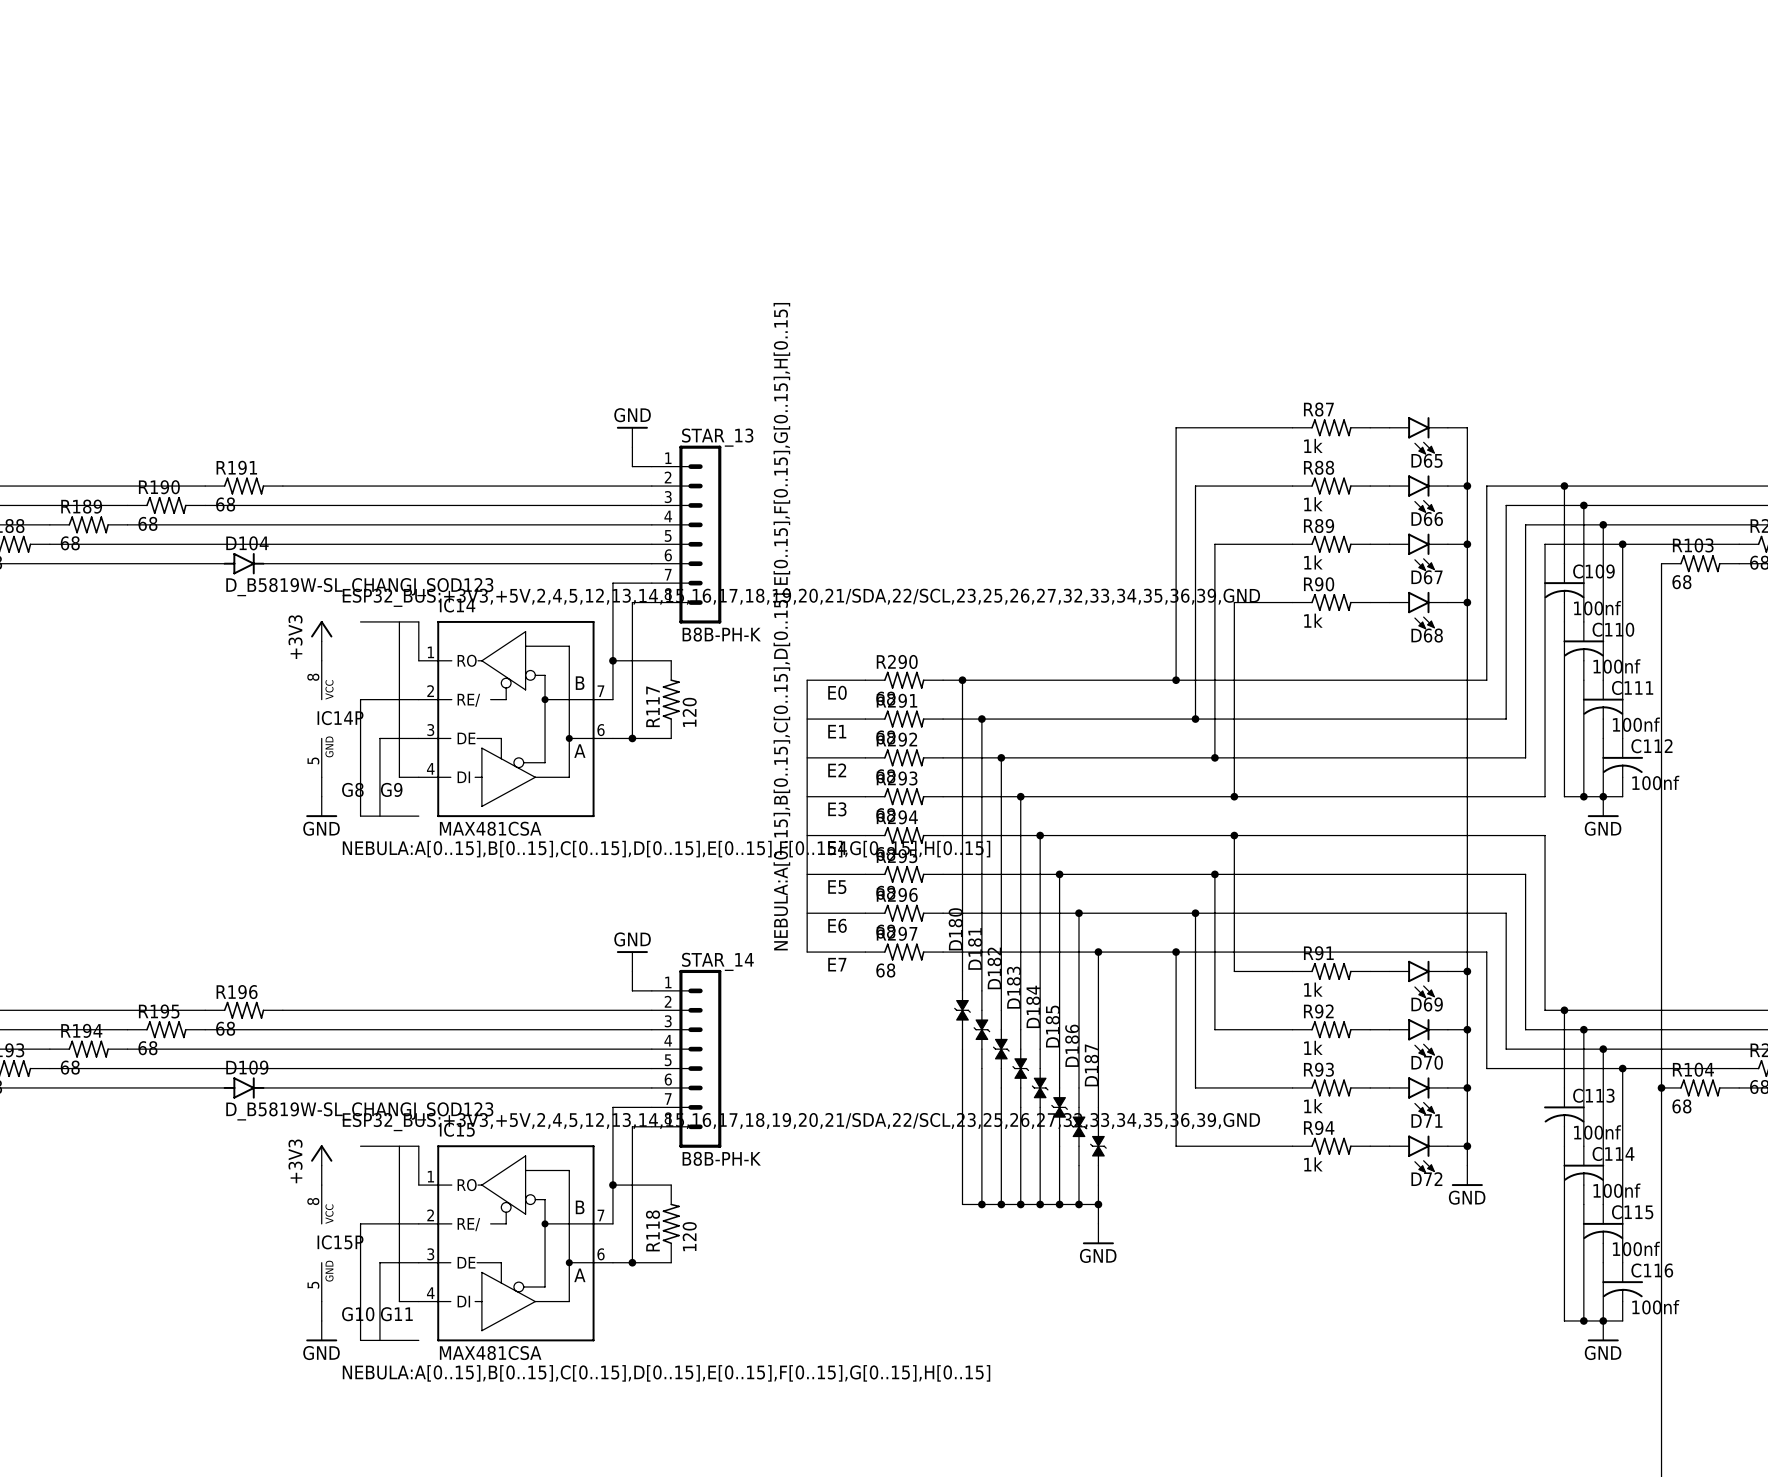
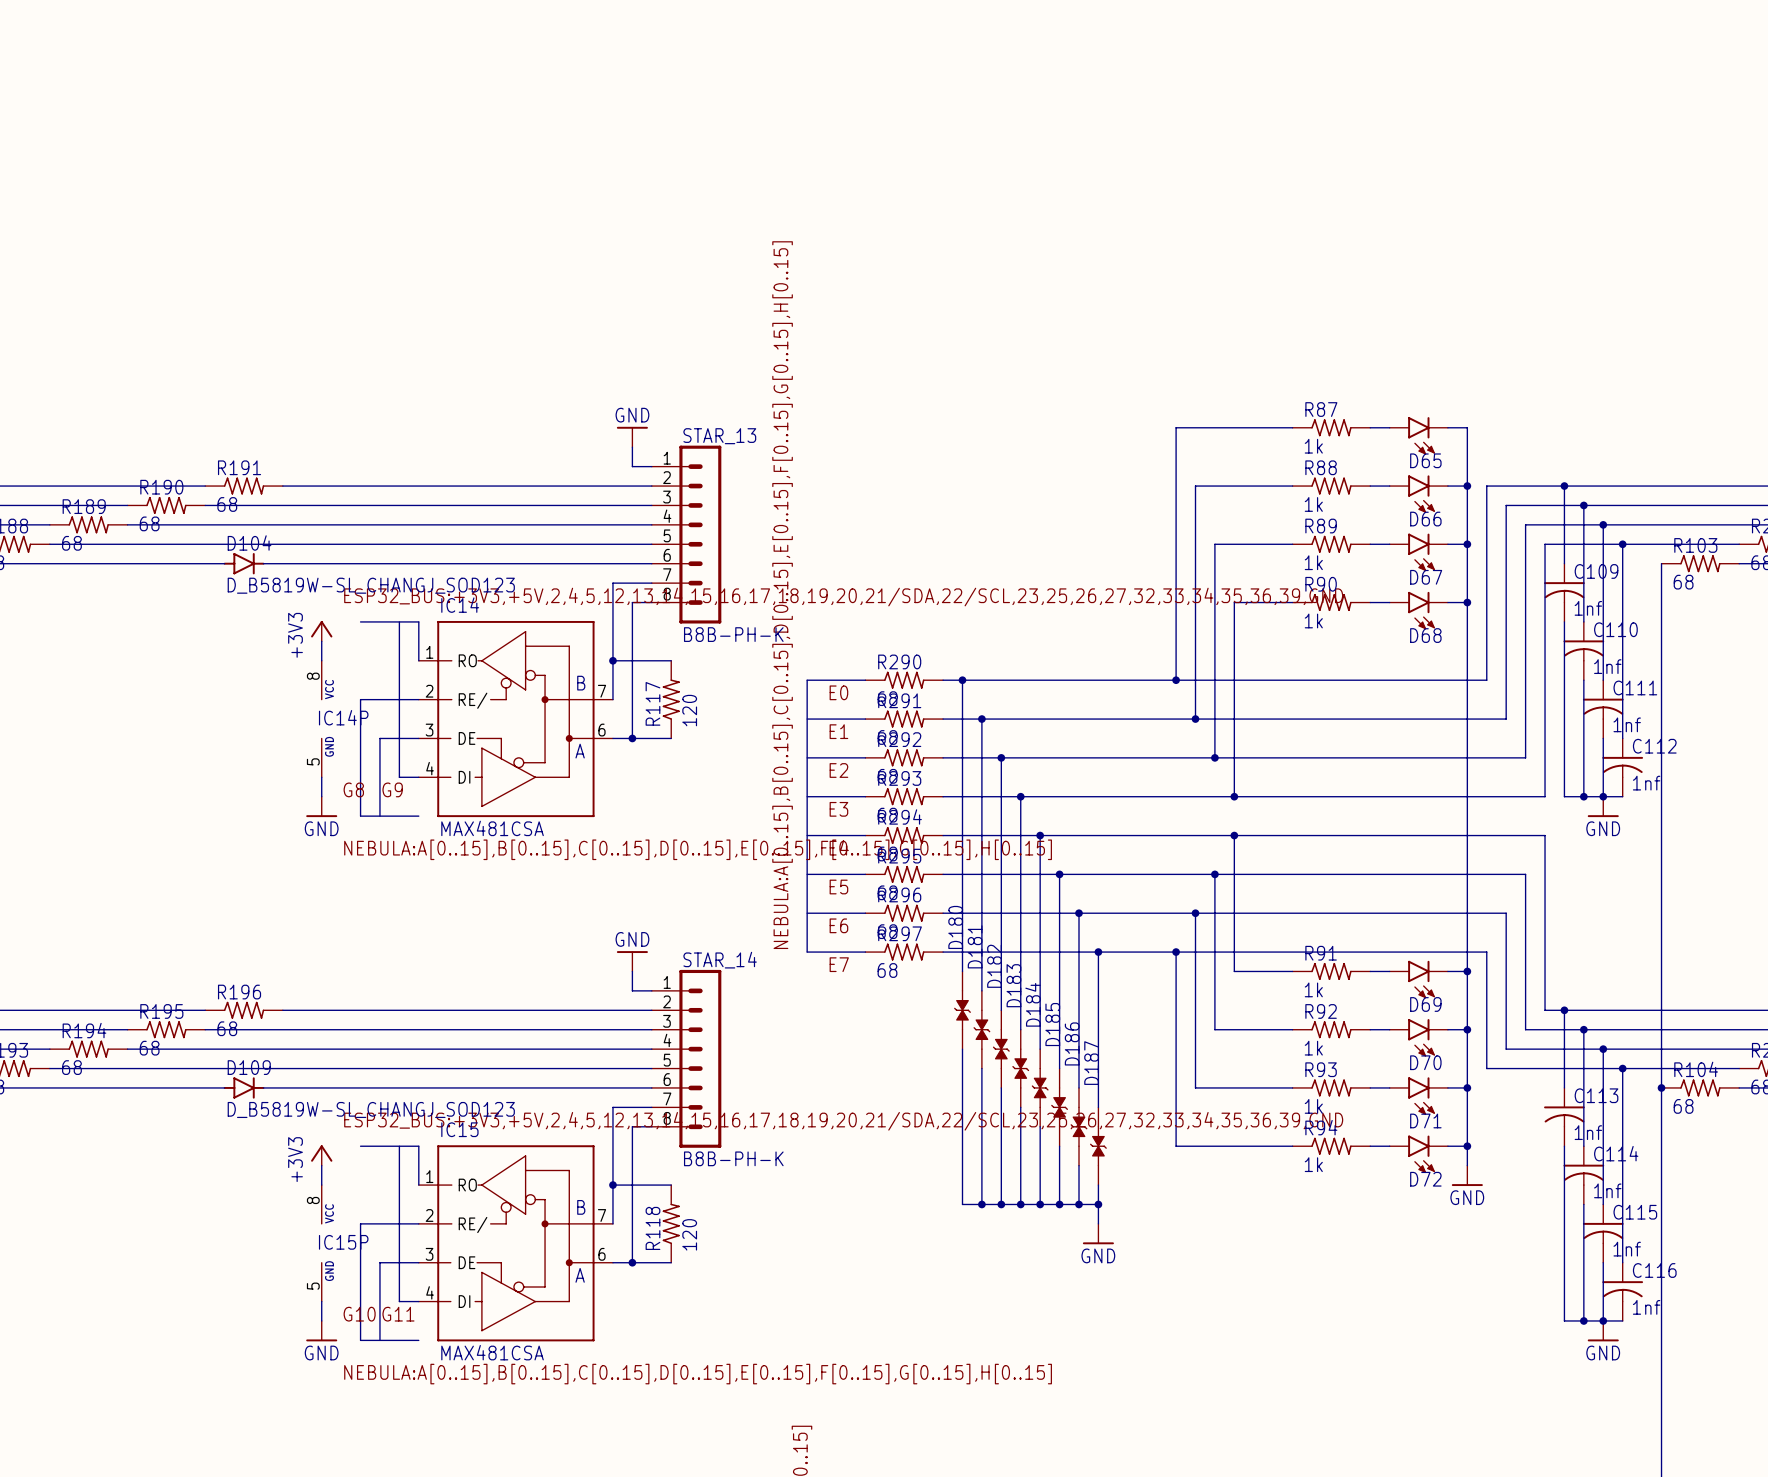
C109 value: 100nf (1597, 608) -> 1nf (1588, 608)
C110 value: 100nf (1616, 666) -> 1nf (1607, 666)
C111 value: 100nf (1636, 724) -> 1nf (1627, 724)
C112 value: 100nf (1655, 782) -> 1nf (1646, 783)
C113 value: 100nf (1597, 1132) -> 1nf (1588, 1132)
C114 value: 100nf (1616, 1190) -> 1nf (1607, 1190)
C115 value: 100nf (1636, 1248) -> 1nf (1627, 1249)
C116 value: 100nf (1655, 1307) -> 1nf (1646, 1307)

